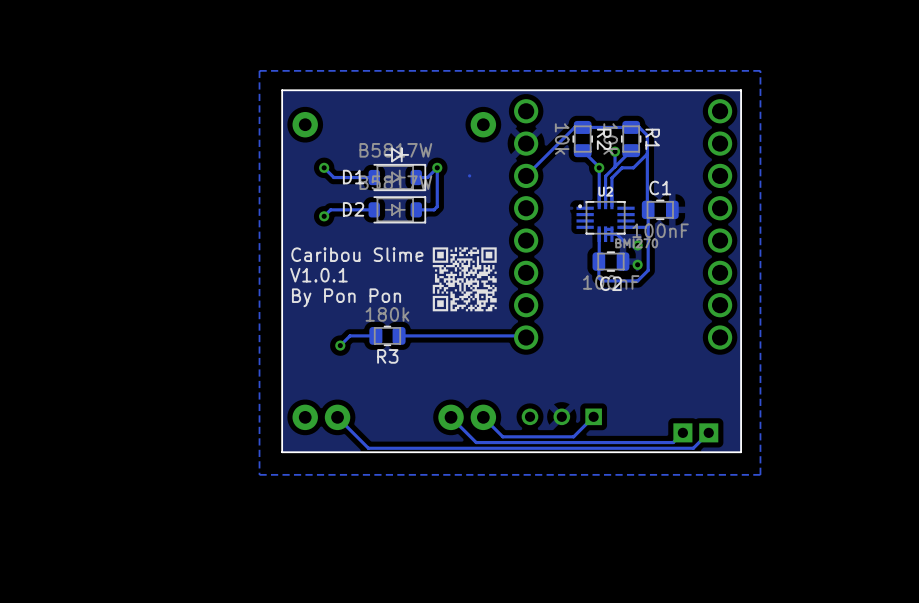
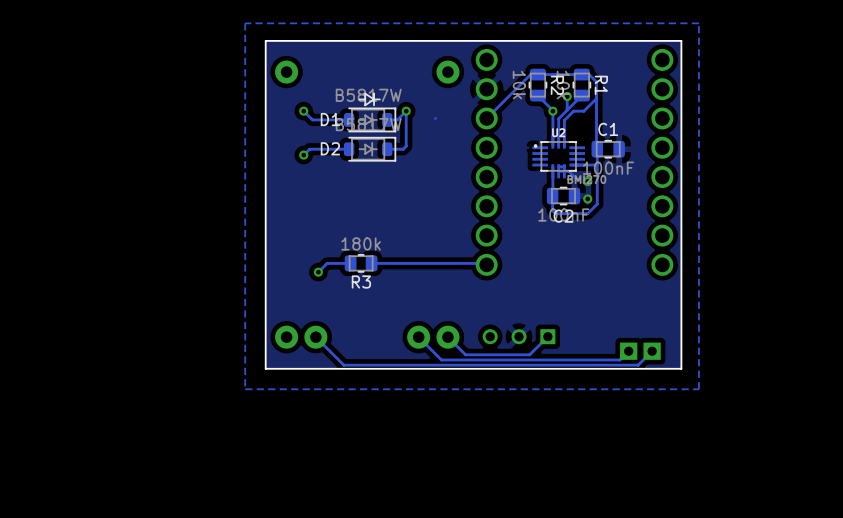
drawing: [432, 247, 497, 312] -> none
text: Caribou Slime (357, 254) -> none
text: V1.0.1 (318, 275) -> none
text: By Pon Pon (346, 297) -> none

